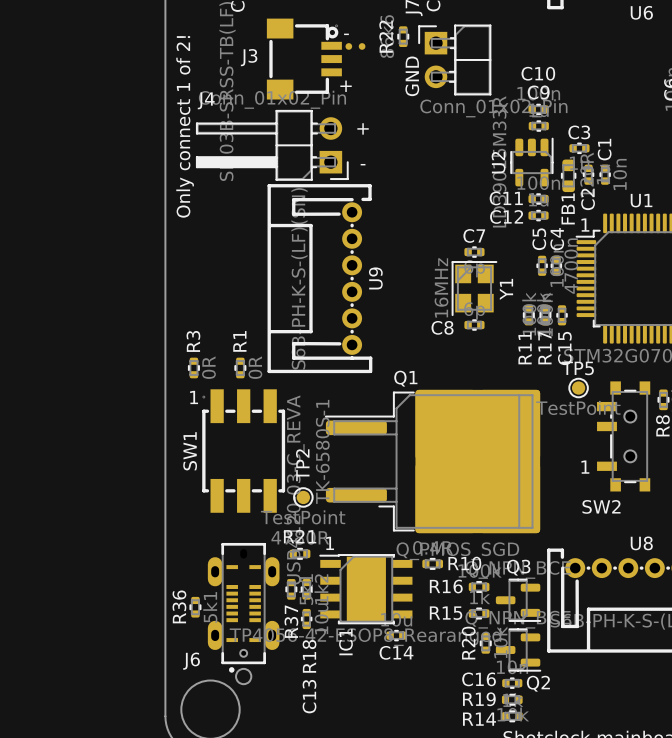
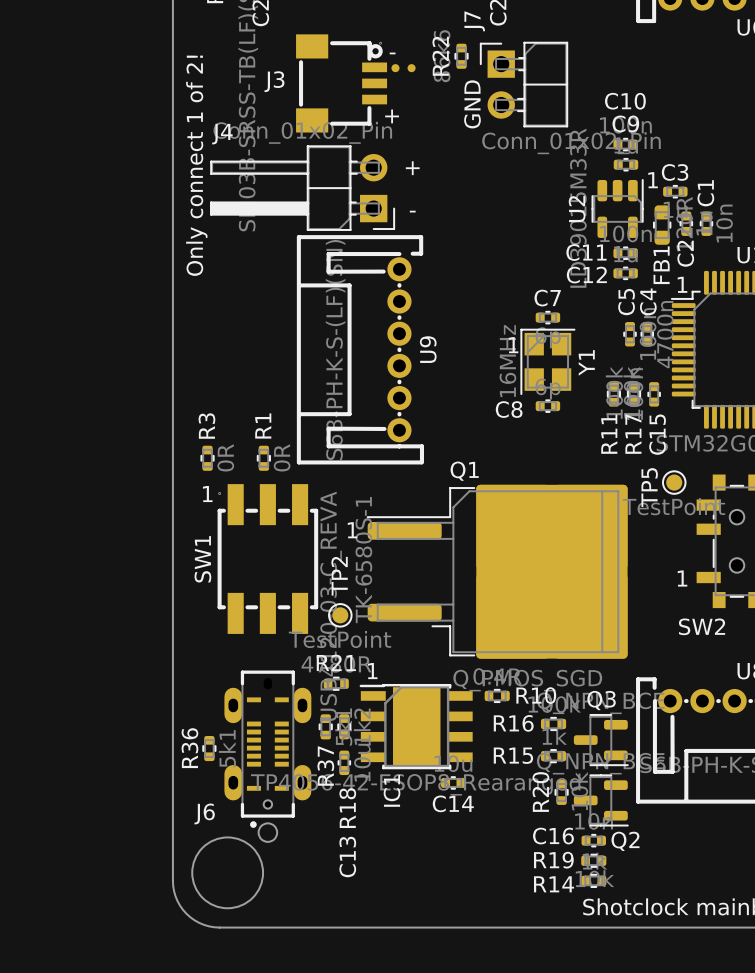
U2 text: none -> 1 (653, 180)
Y1 text: none -> 1 (513, 345)
TP5 name rotation: 0° (577, 368) -> 90° counterclockwise (649, 487)
Q1 text: none -> 1 (352, 530)

